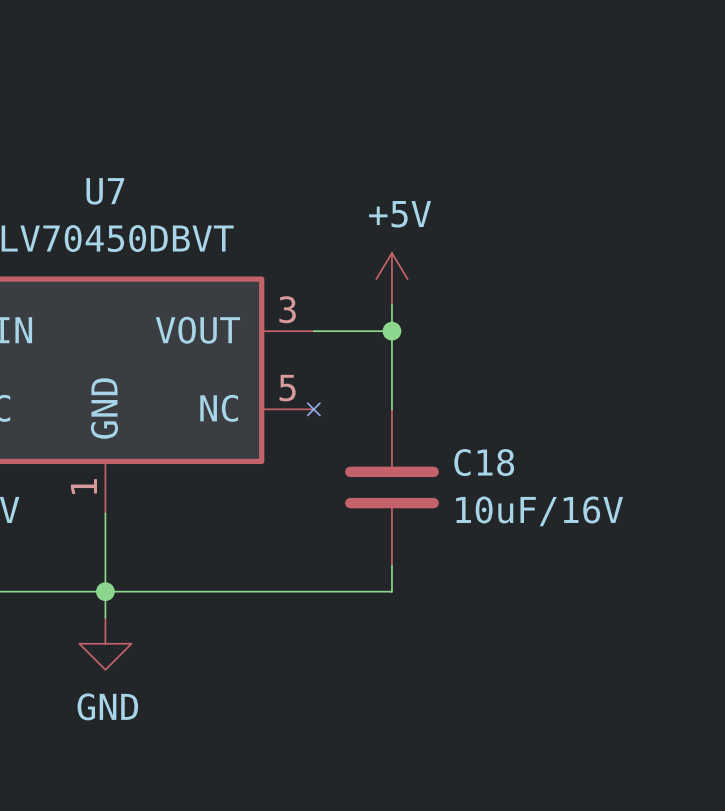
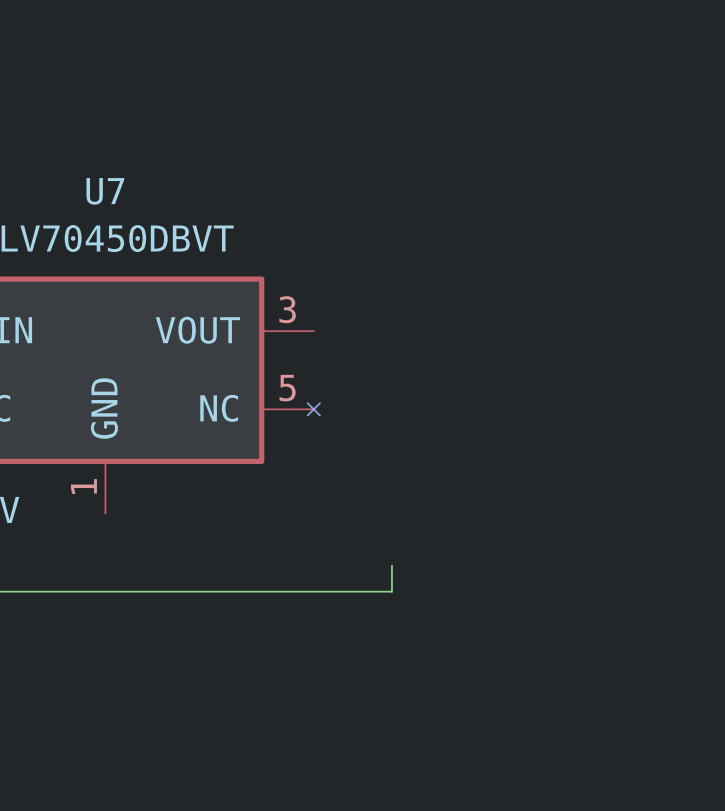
power symbol: +5V (391, 279) -> none
wire: (391, 305) (391, 409) -> none
wire: (313, 331) (391, 331) -> none
junction: (391, 331) -> none
C18: 10uF/16V (391, 487) -> none
wire: (105, 513) (105, 617) -> none
junction: (105, 591) -> none
power symbol: GND (105, 643) -> none

